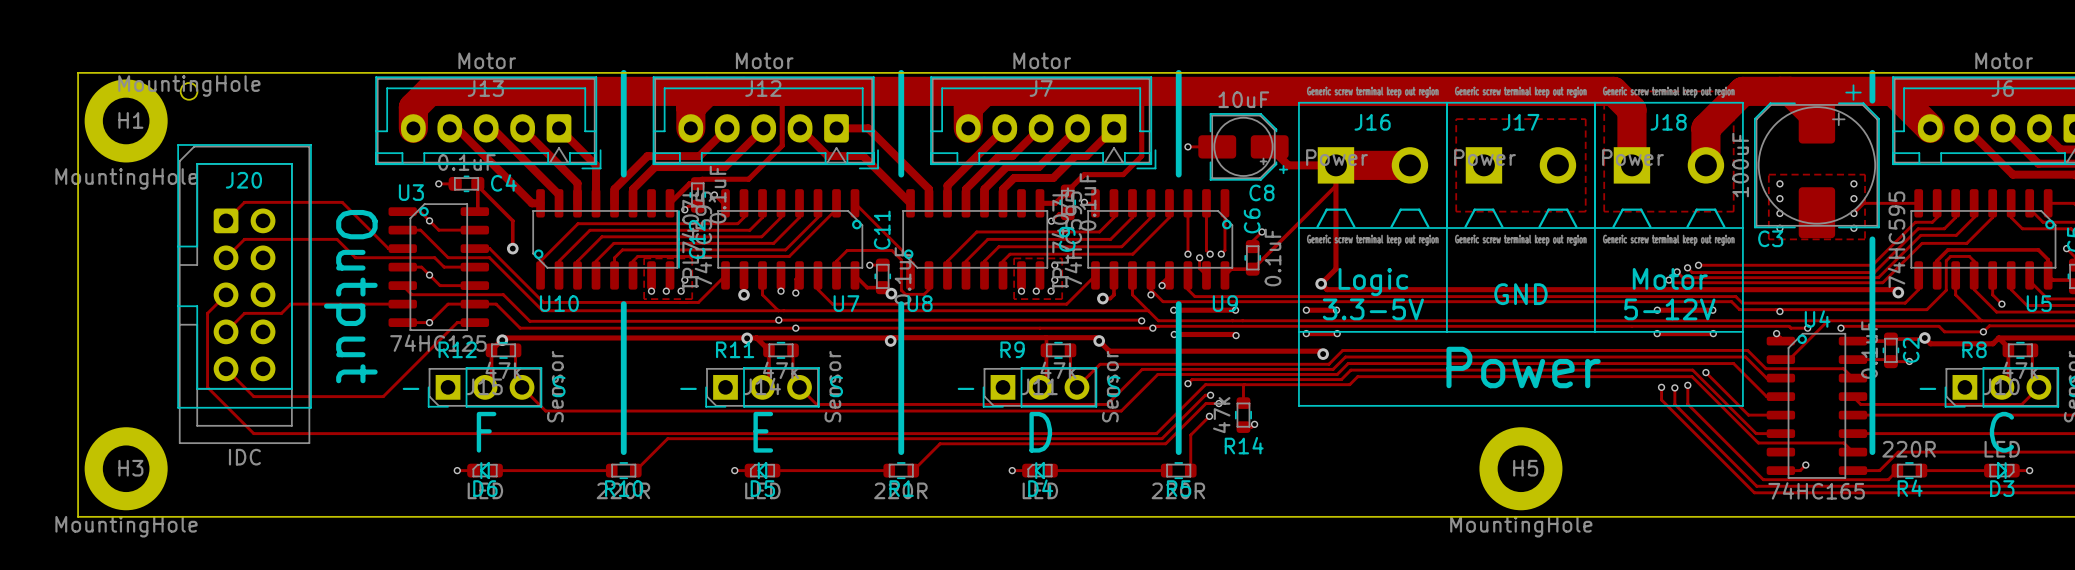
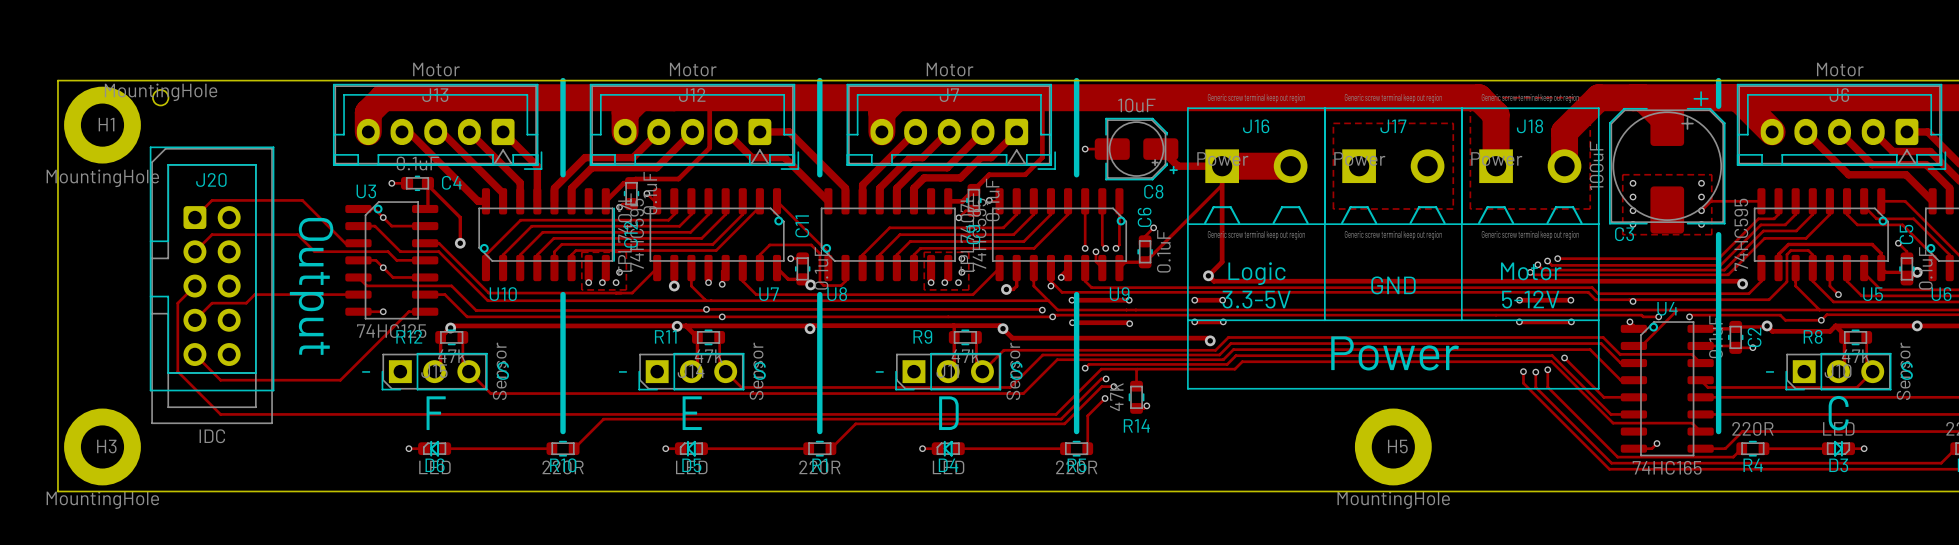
track: (474, 304) (448, 304) (429, 322) -> none

